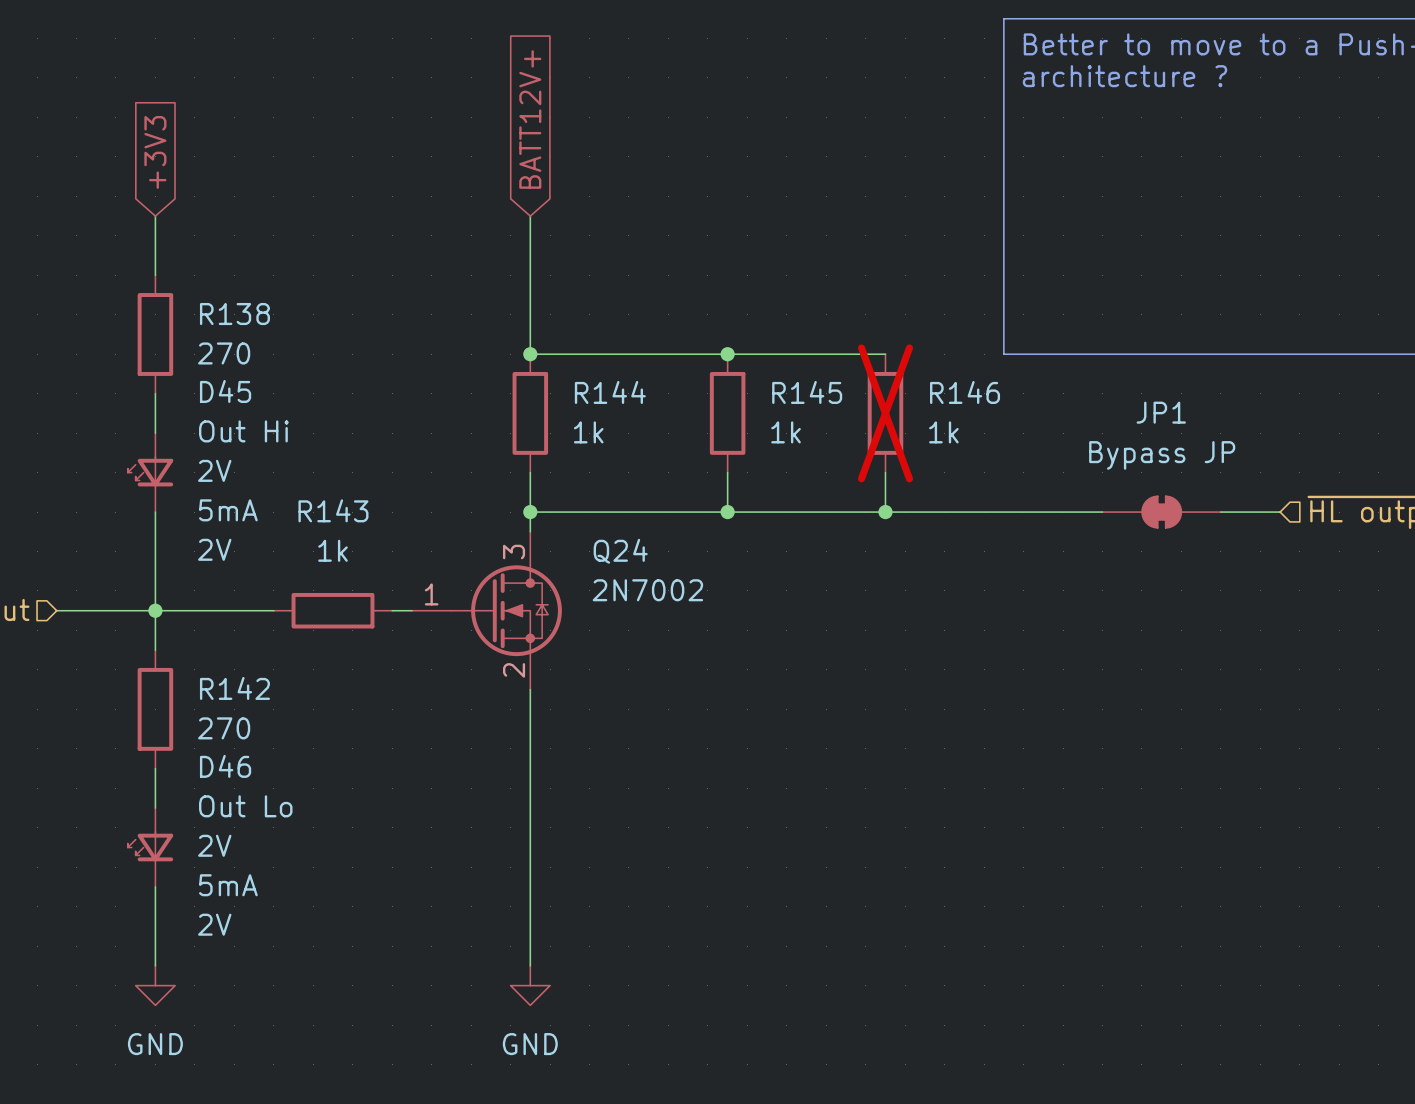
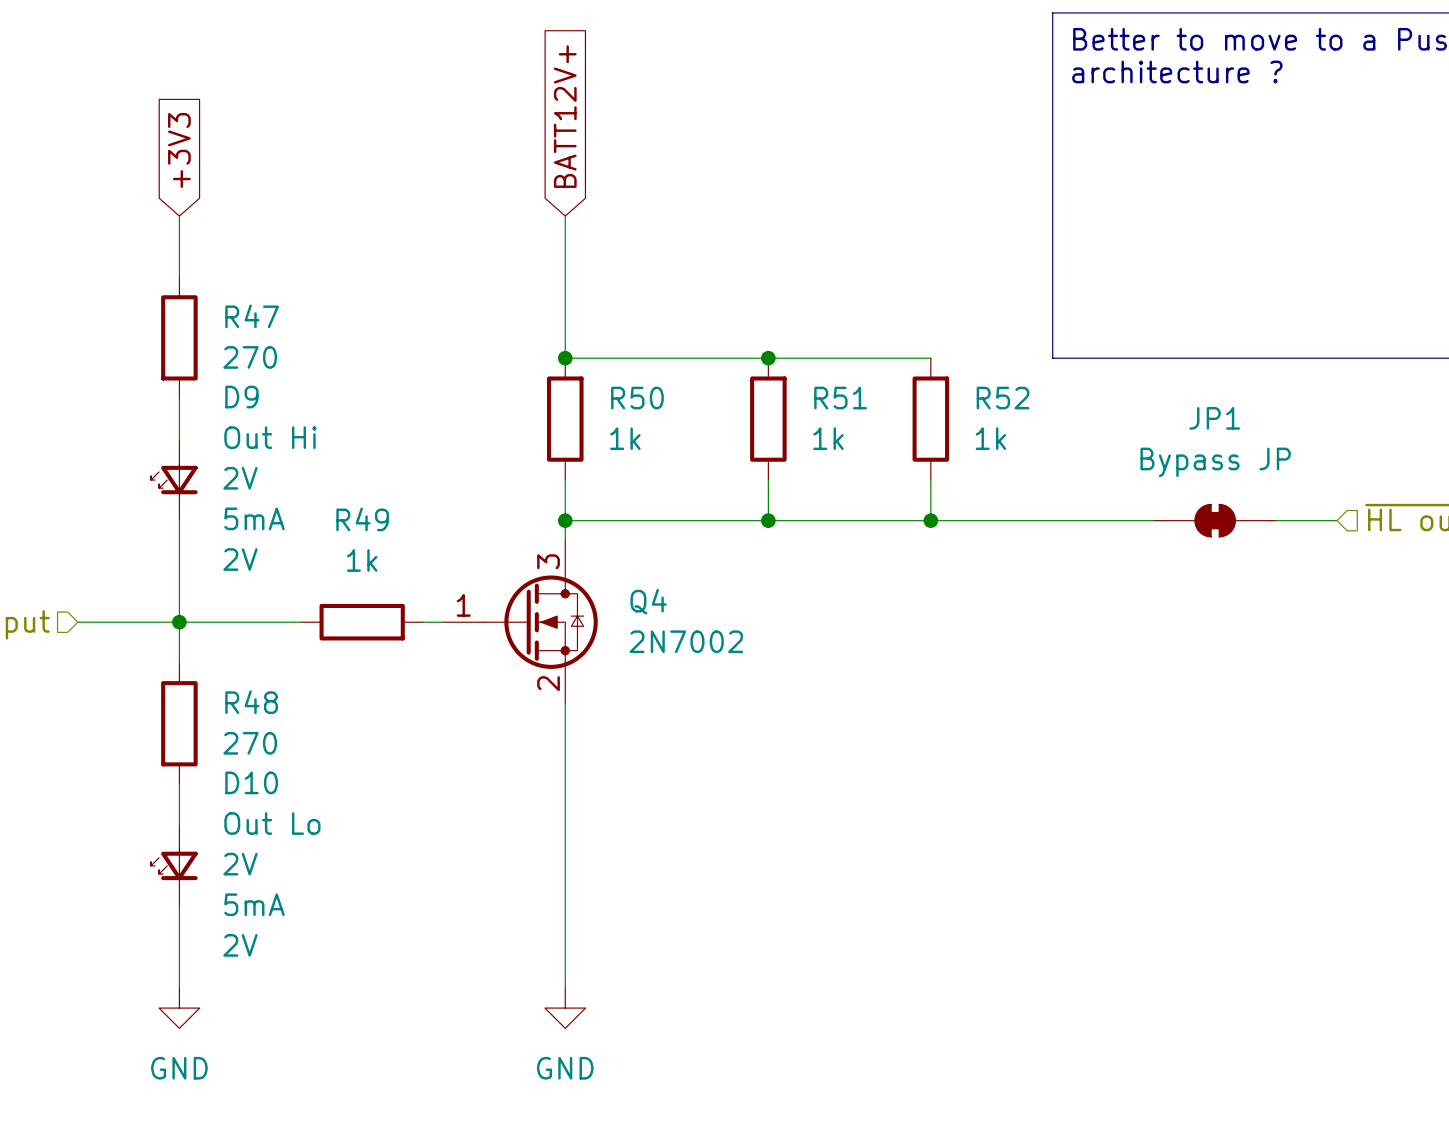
R138 name: R138 (234, 314) -> R47 (252, 316)
D45 name: D45 (225, 391) -> D9 (241, 397)
R144 name: R144 (610, 392) -> R50 (637, 398)
R145 name: R145 (807, 392) -> R51 (840, 398)
R146 name: R146 (965, 392) -> R52 (1003, 398)
R146 do-not-place cross: (885, 413) -> none
R143 name: R143 (333, 510) -> R49 (362, 519)
Q24 name: Q24 (620, 551) -> Q4 (648, 601)
Q24 value position: 2N7002 (647, 590) -> 2N7002 (686, 641)
R142 name: R142 (234, 688) -> R48 (251, 702)
D46 name: D46 (225, 766) -> D10 (251, 782)

